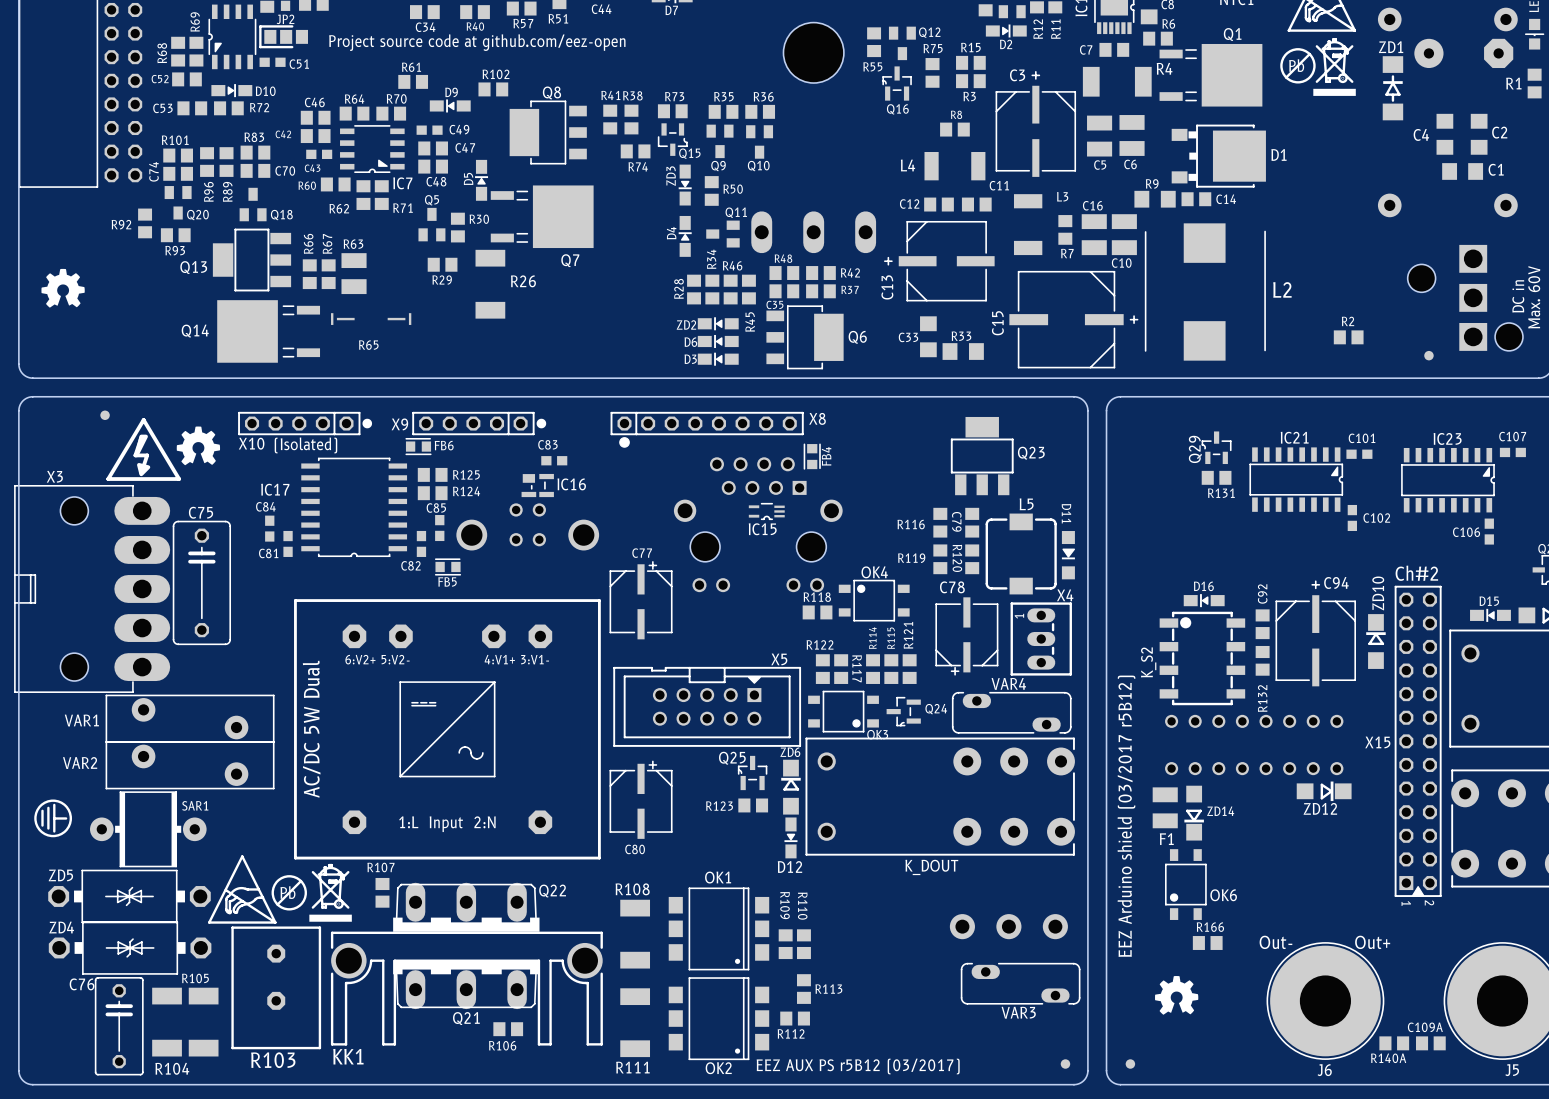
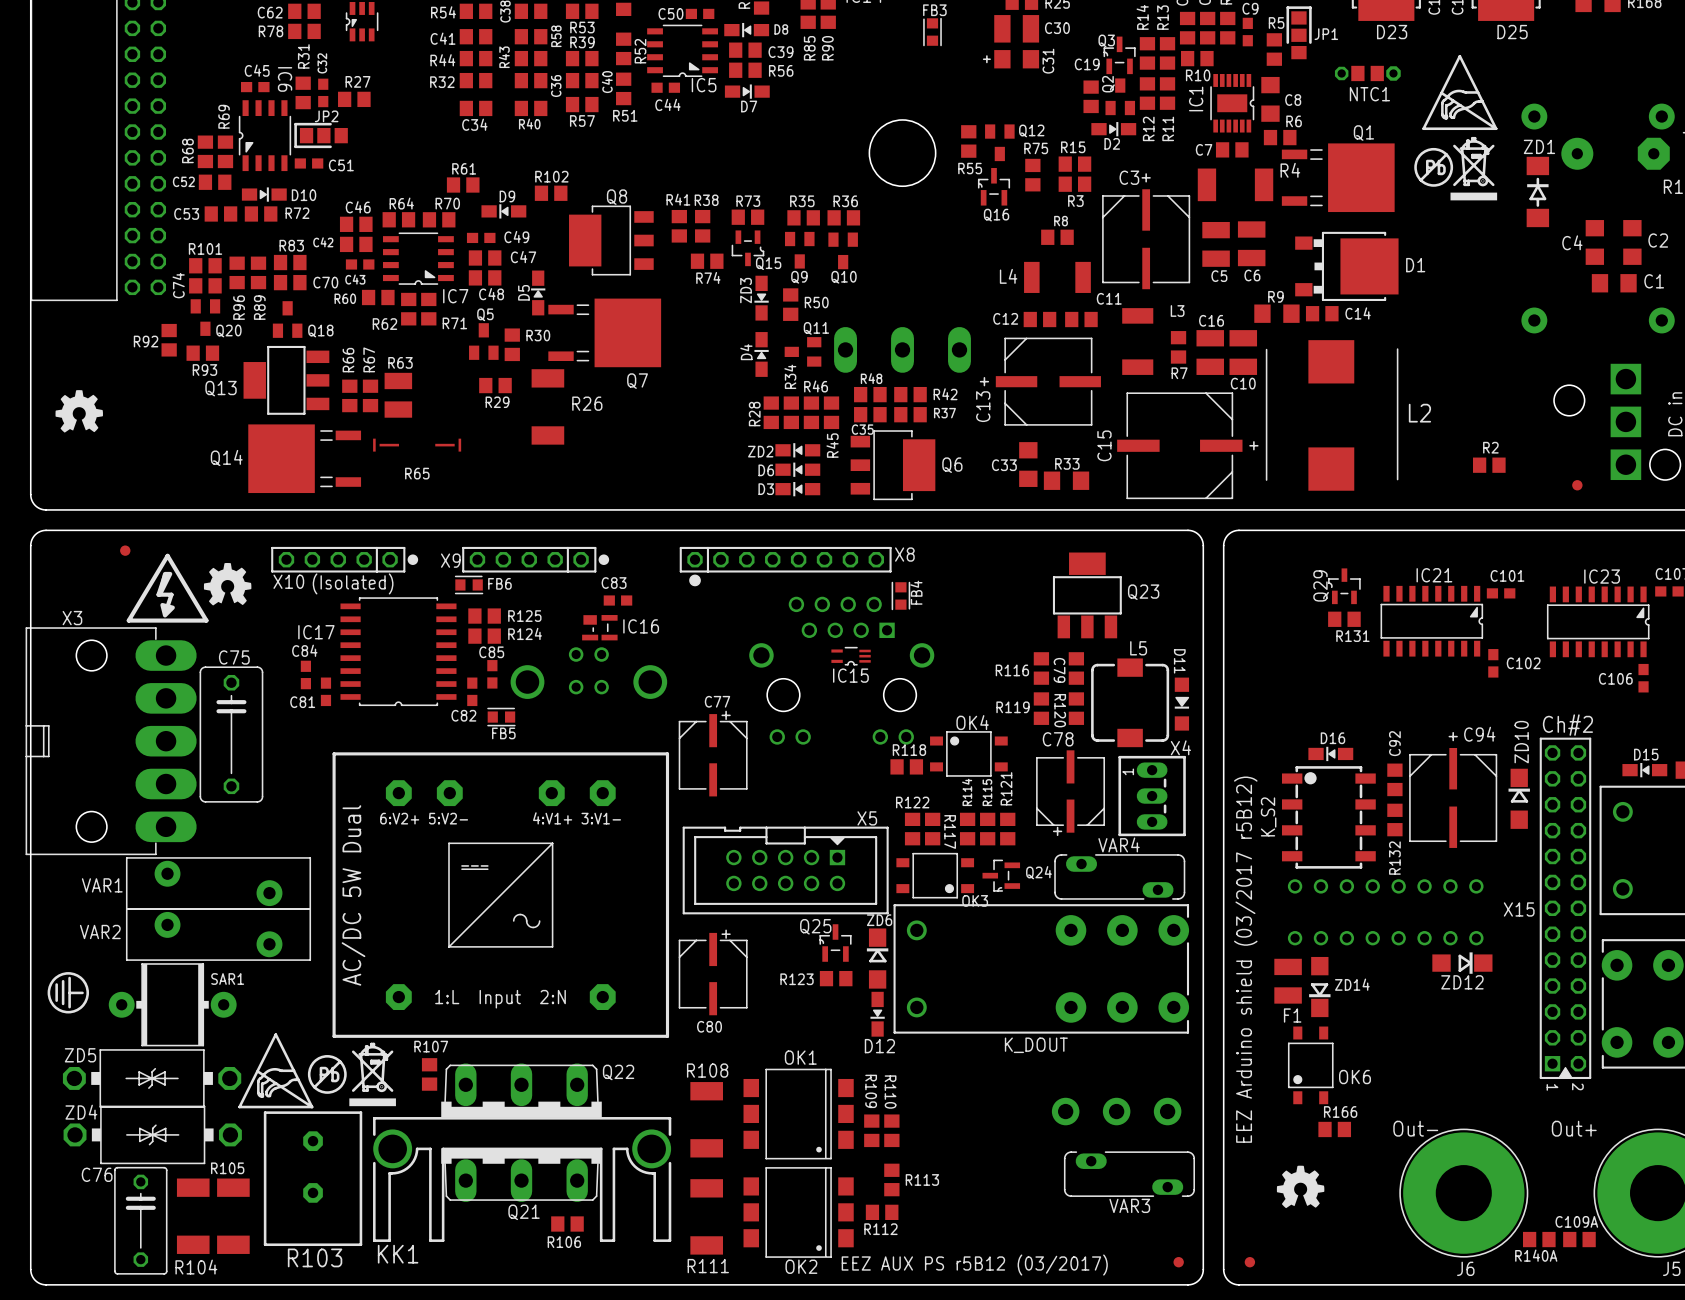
text: Project source code at github.com/eez-open (477, 42) -> none

